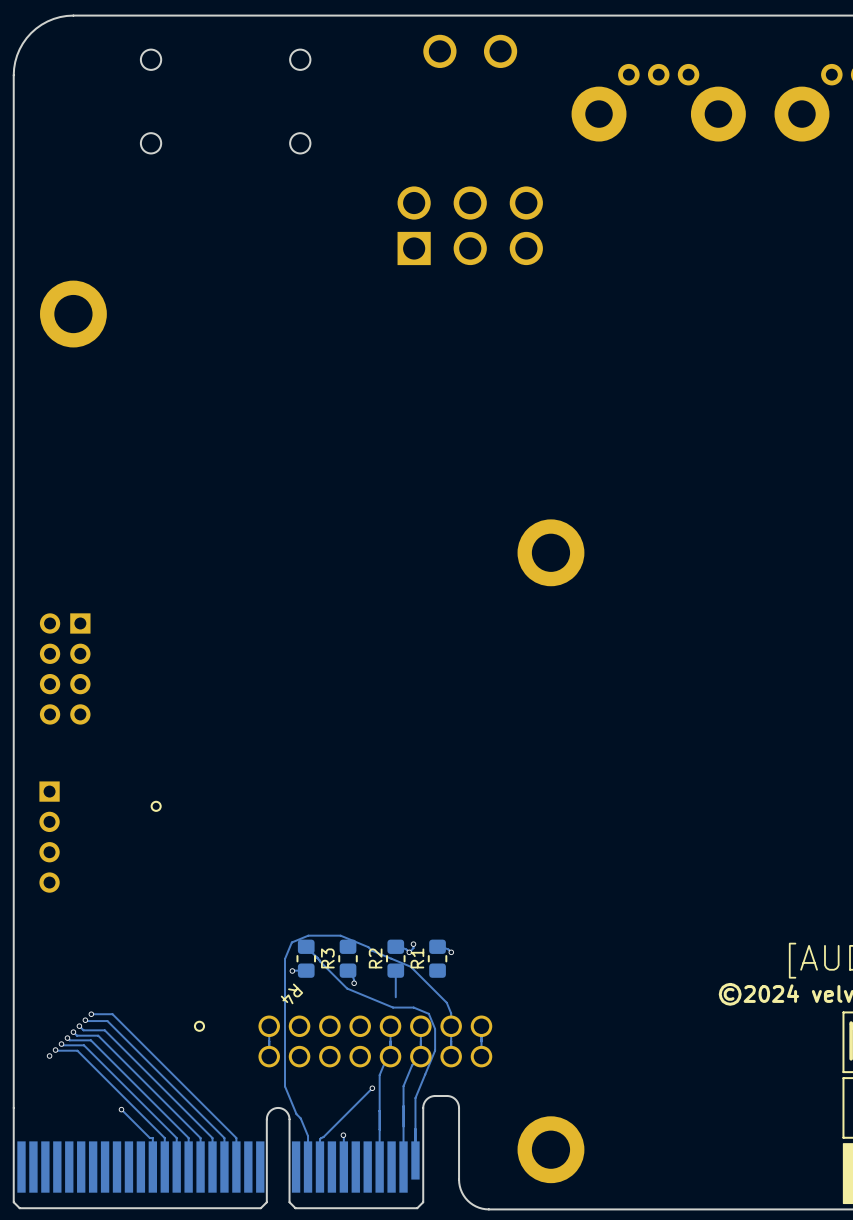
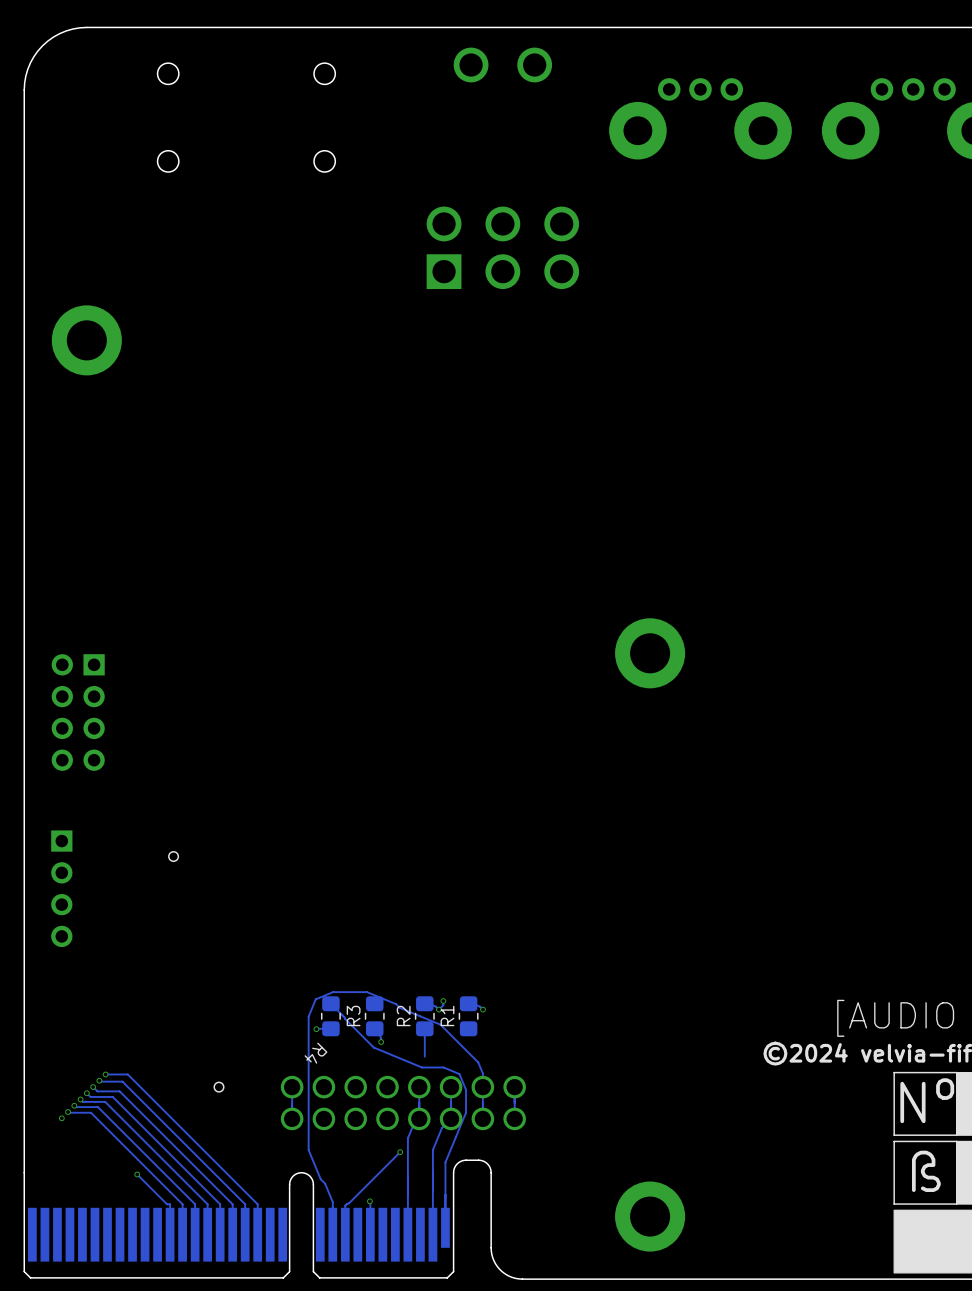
part position: (550, 552) -> (650, 653)
part position: (550, 1149) -> (650, 1216)

